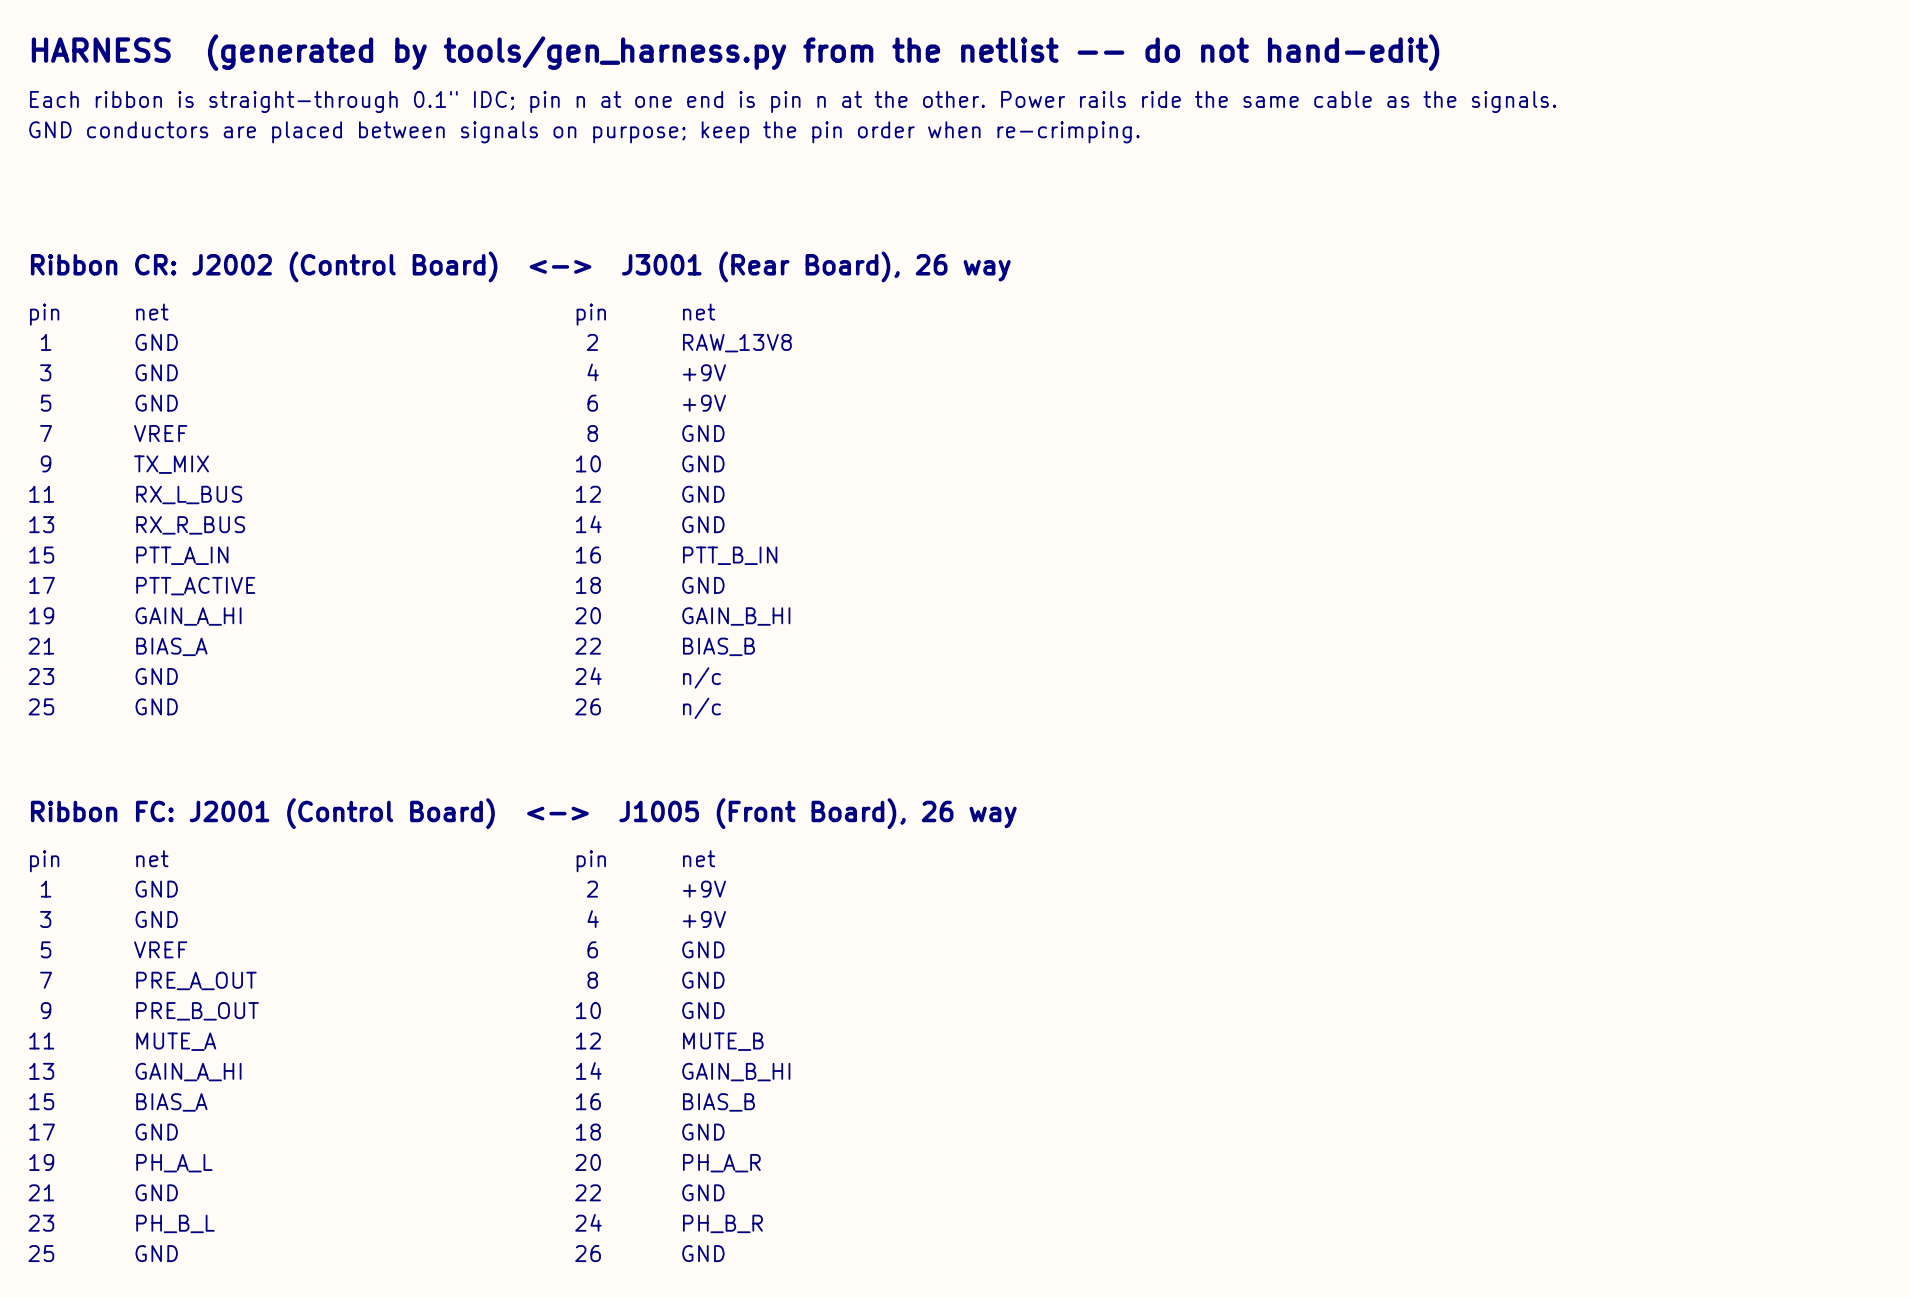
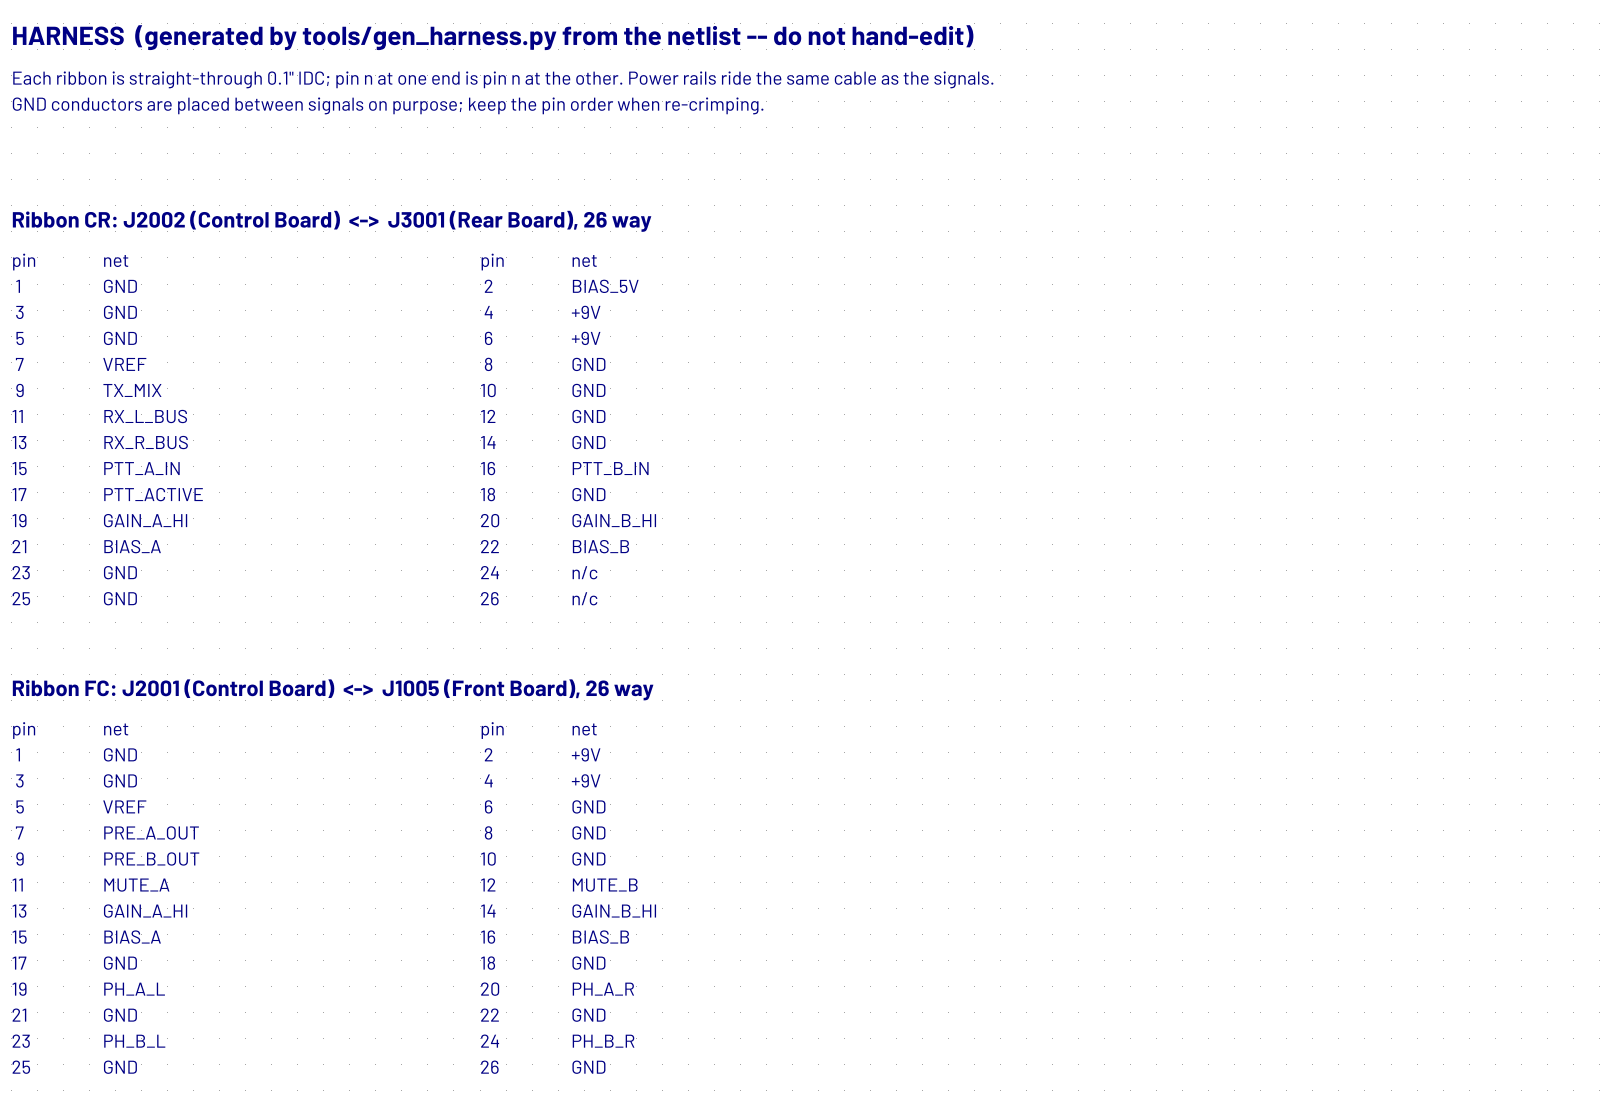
text: RAW_13V8 (737, 343) -> BIAS_5V (605, 286)

